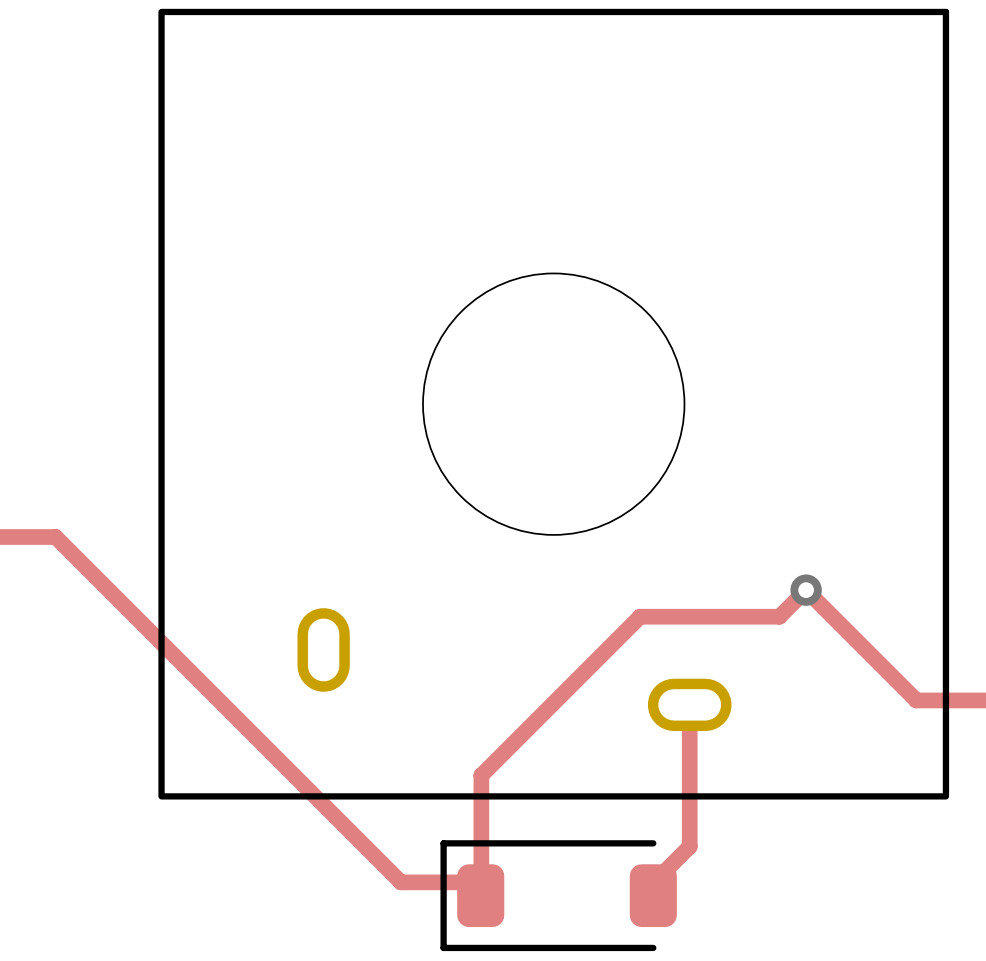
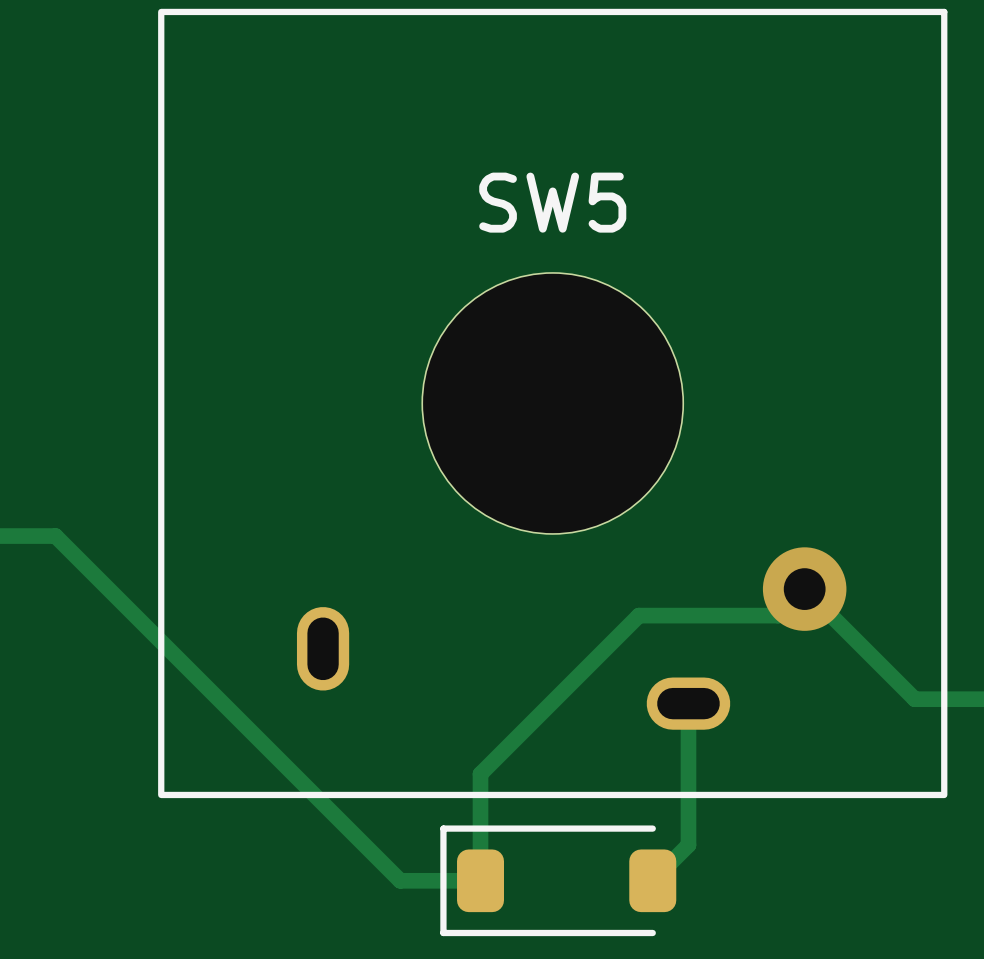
SW5: none -> (552, 472)
via size: [790, 574, 822, 606] -> [762, 547, 847, 631]
part: (558, 895) -> none

